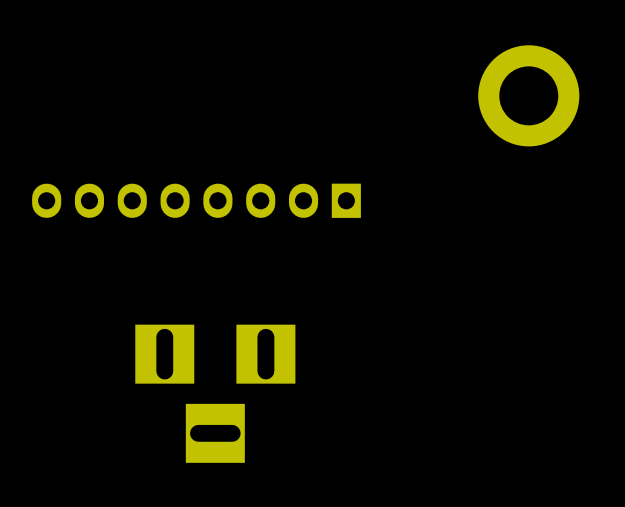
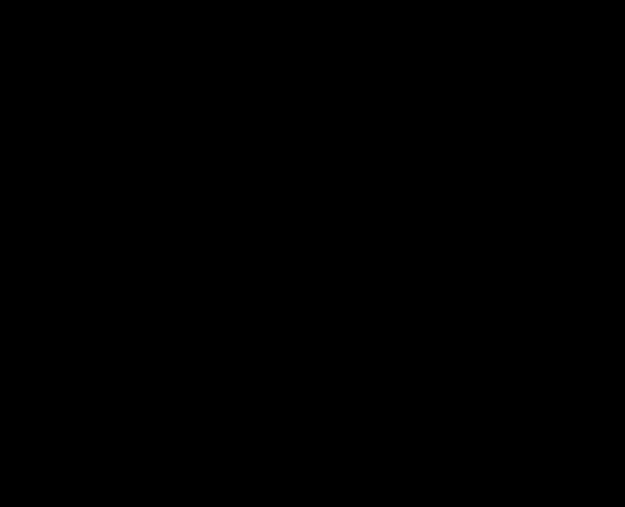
part: (528, 95) -> none
part: (196, 200) -> none
part: (215, 393) -> none

